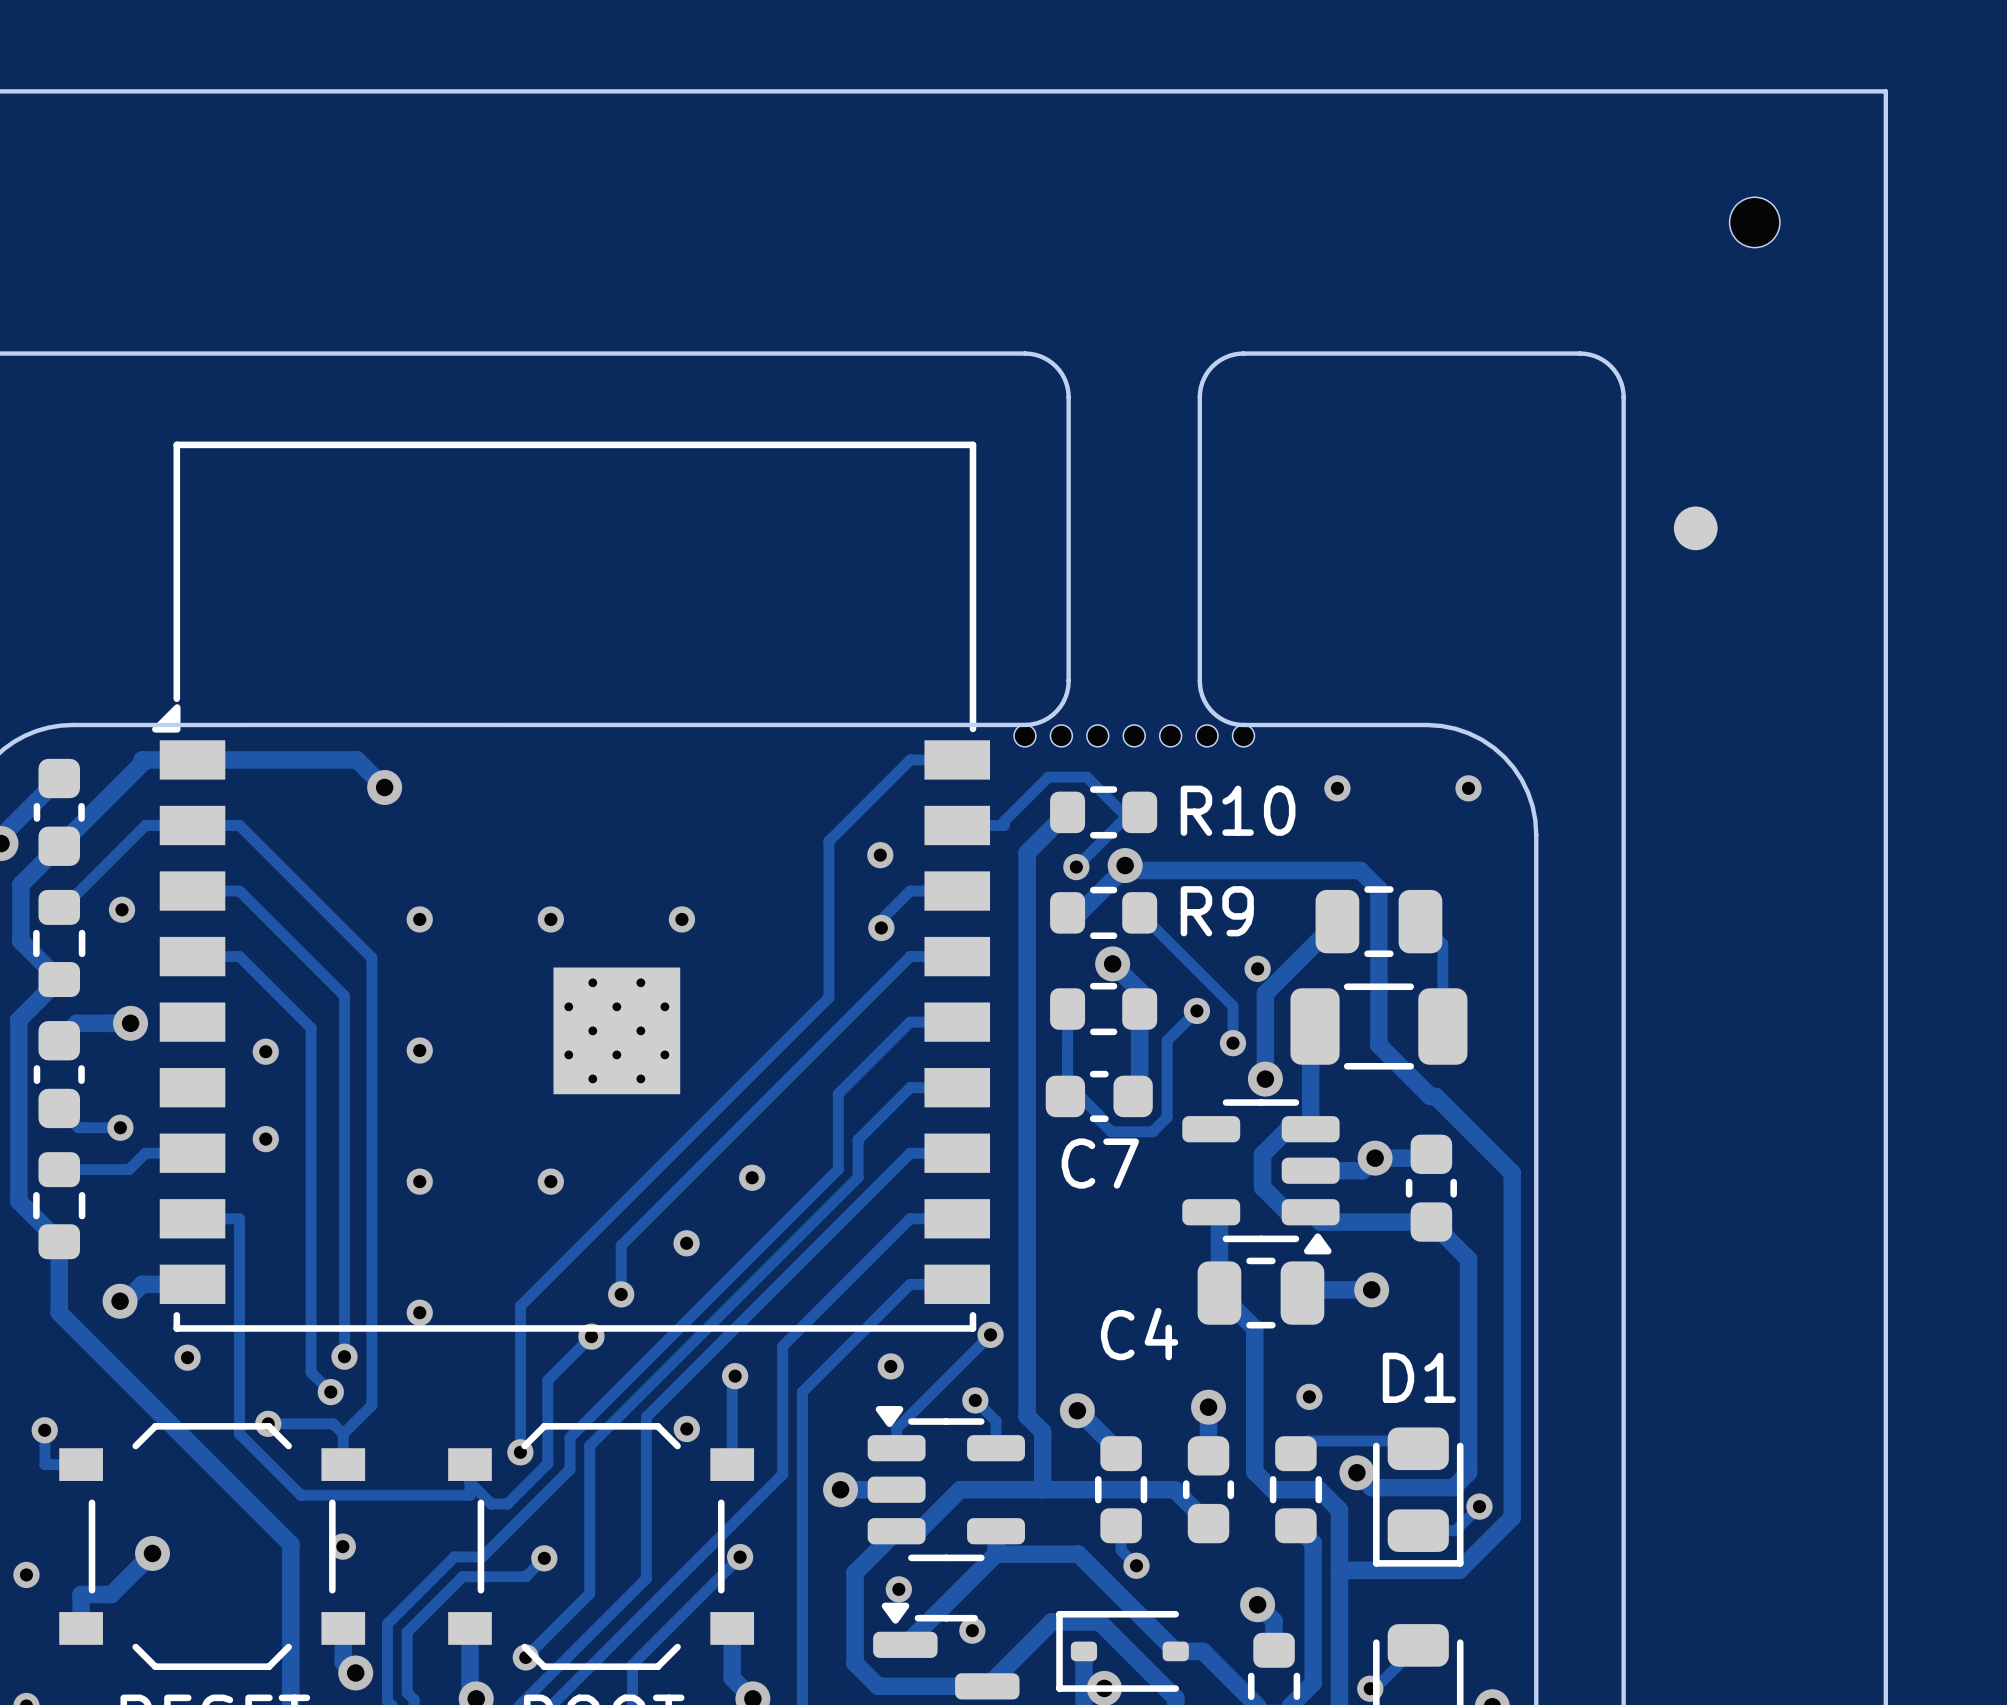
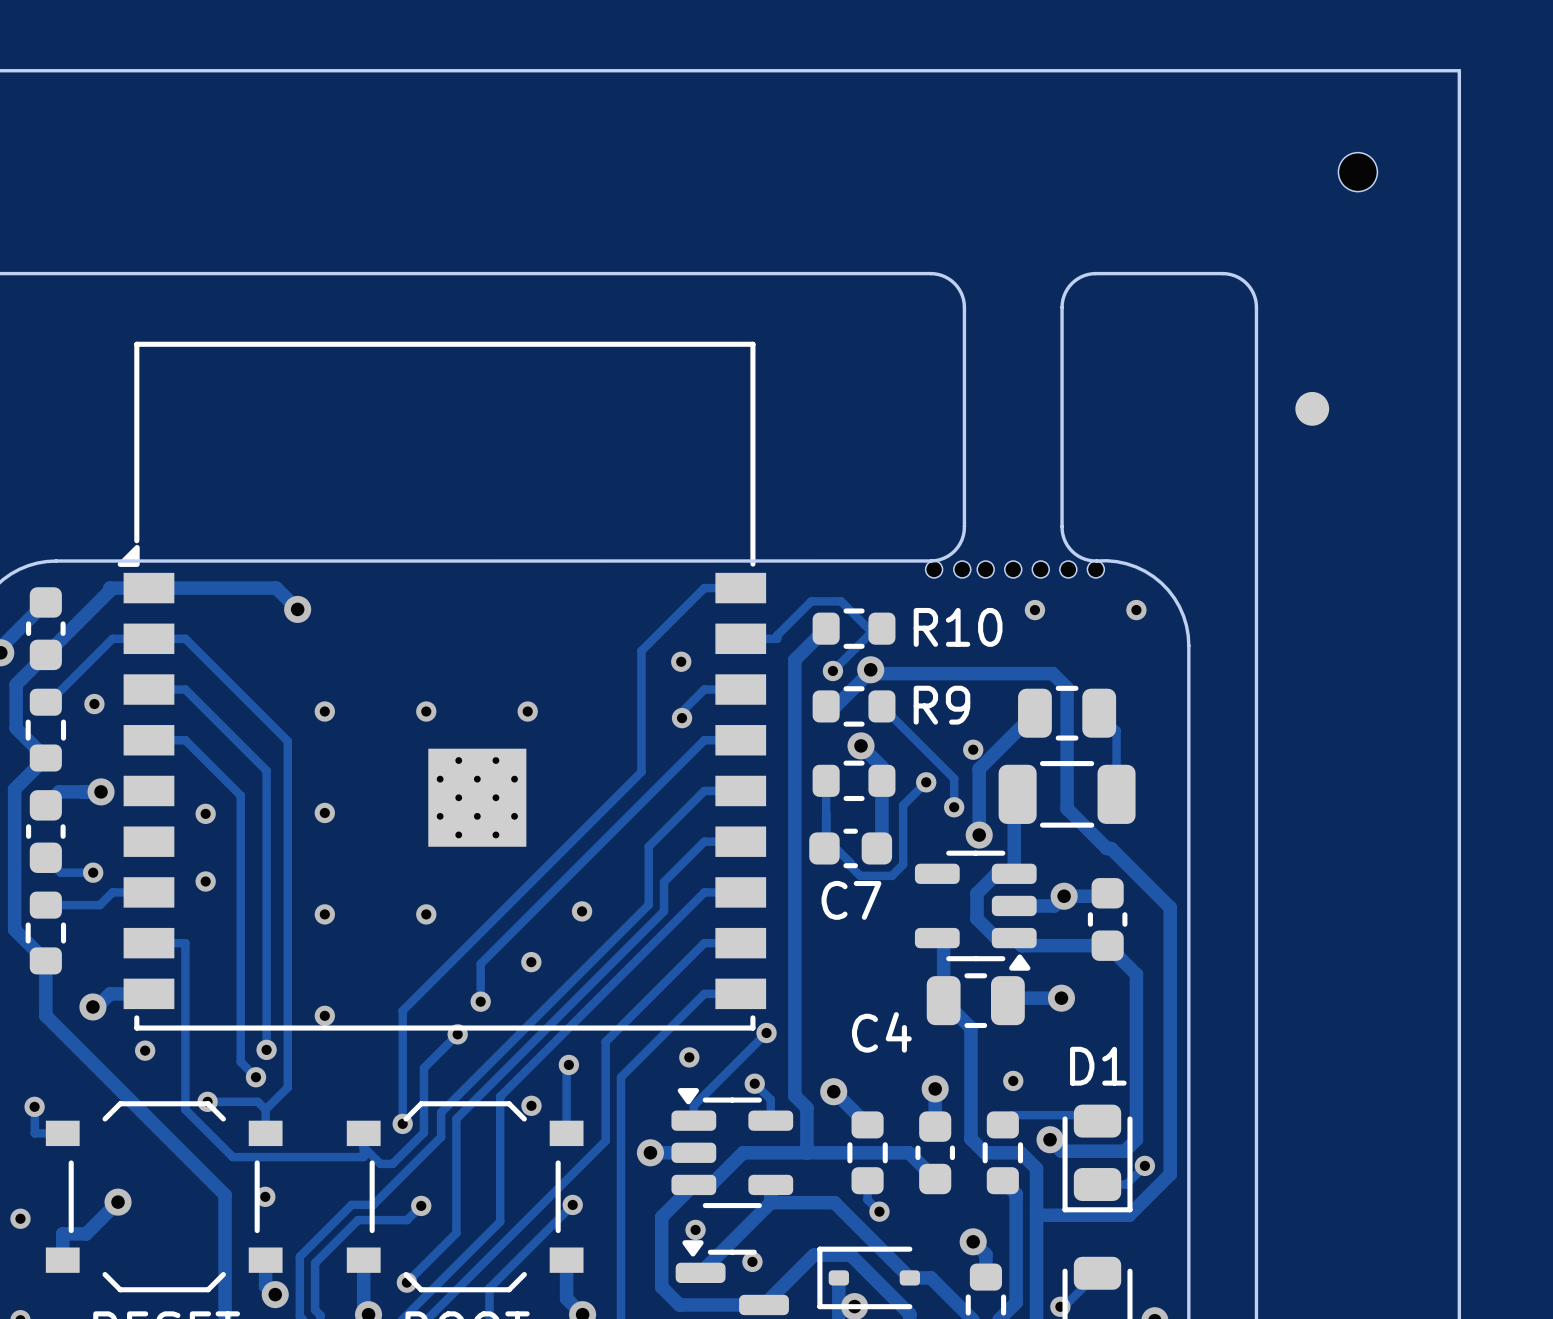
board edge: (1024, 353) (1039, 355) (1055, 366) (1066, 382) (1068, 397) (1068, 686) (1065, 697) (1056, 711) (1042, 721) (1025, 724) -> (793, 273) (938, 274) (948, 278) (957, 286) (962, 296) (964, 307) (964, 526) (962, 539) (957, 547) (944, 558) (931, 560) (793, 560)
board edge: (1416, 353) (1238, 353) (1220, 360) (1206, 373) (1202, 382) (1199, 397) (1200, 690) (1206, 704) (1212, 712) (1225, 721) (1234, 724) (1427, 724) (1455, 728) (1469, 733) (1493, 747) (1513, 767) (1521, 779) (1532, 806) (1536, 834) -> (1095, 273) (1081, 276) (1071, 283) (1065, 292) (1062, 303) (1062, 534) (1069, 548) (1081, 557) (1092, 560) (1126, 563) (1145, 571) (1161, 583) (1179, 607) (1186, 625) (1188, 645)
part: (1024, 735) -> none
part: (1061, 735) -> none
part: (1097, 735) -> none
part: (1134, 735) -> none
part: (1170, 735) -> none
part: none -> (985, 569)
part: none -> (1013, 569)
part: none -> (1040, 569)
part: none -> (1068, 569)
part: none -> (1095, 569)

